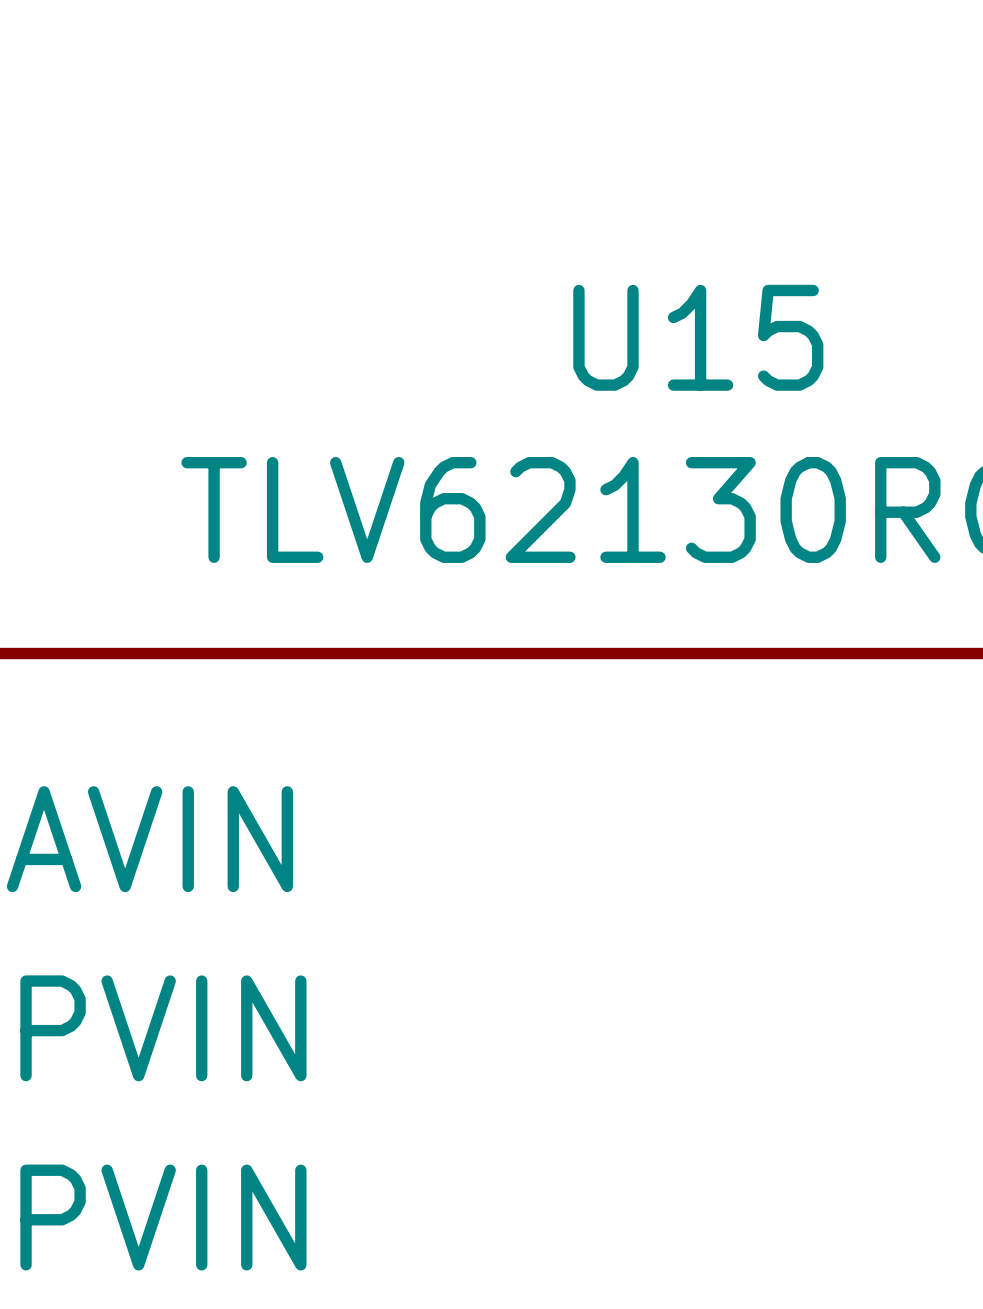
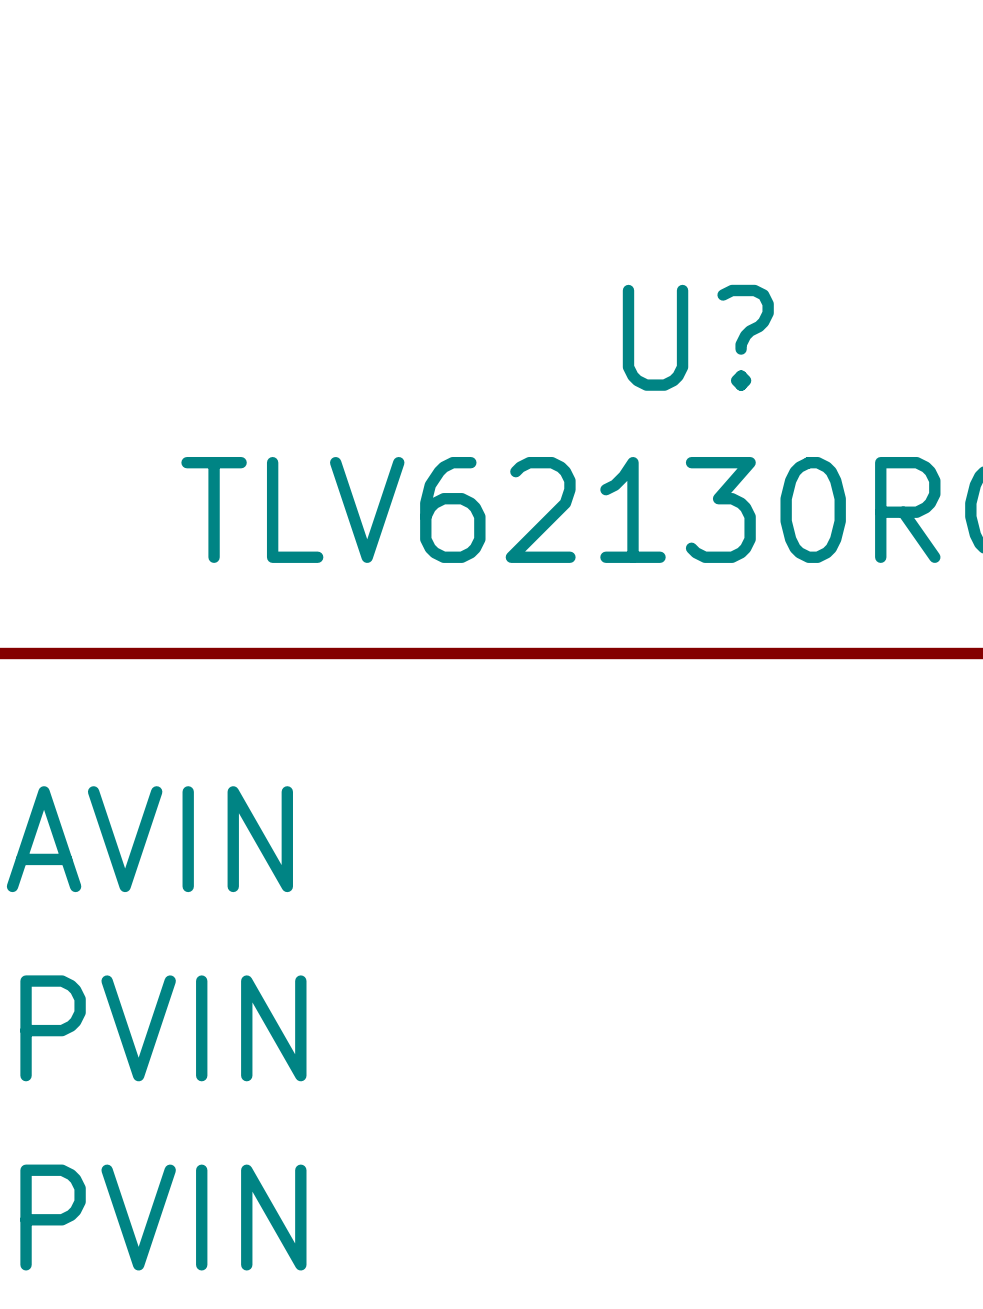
U15 name: U15 (698, 337) -> U? (698, 337)

